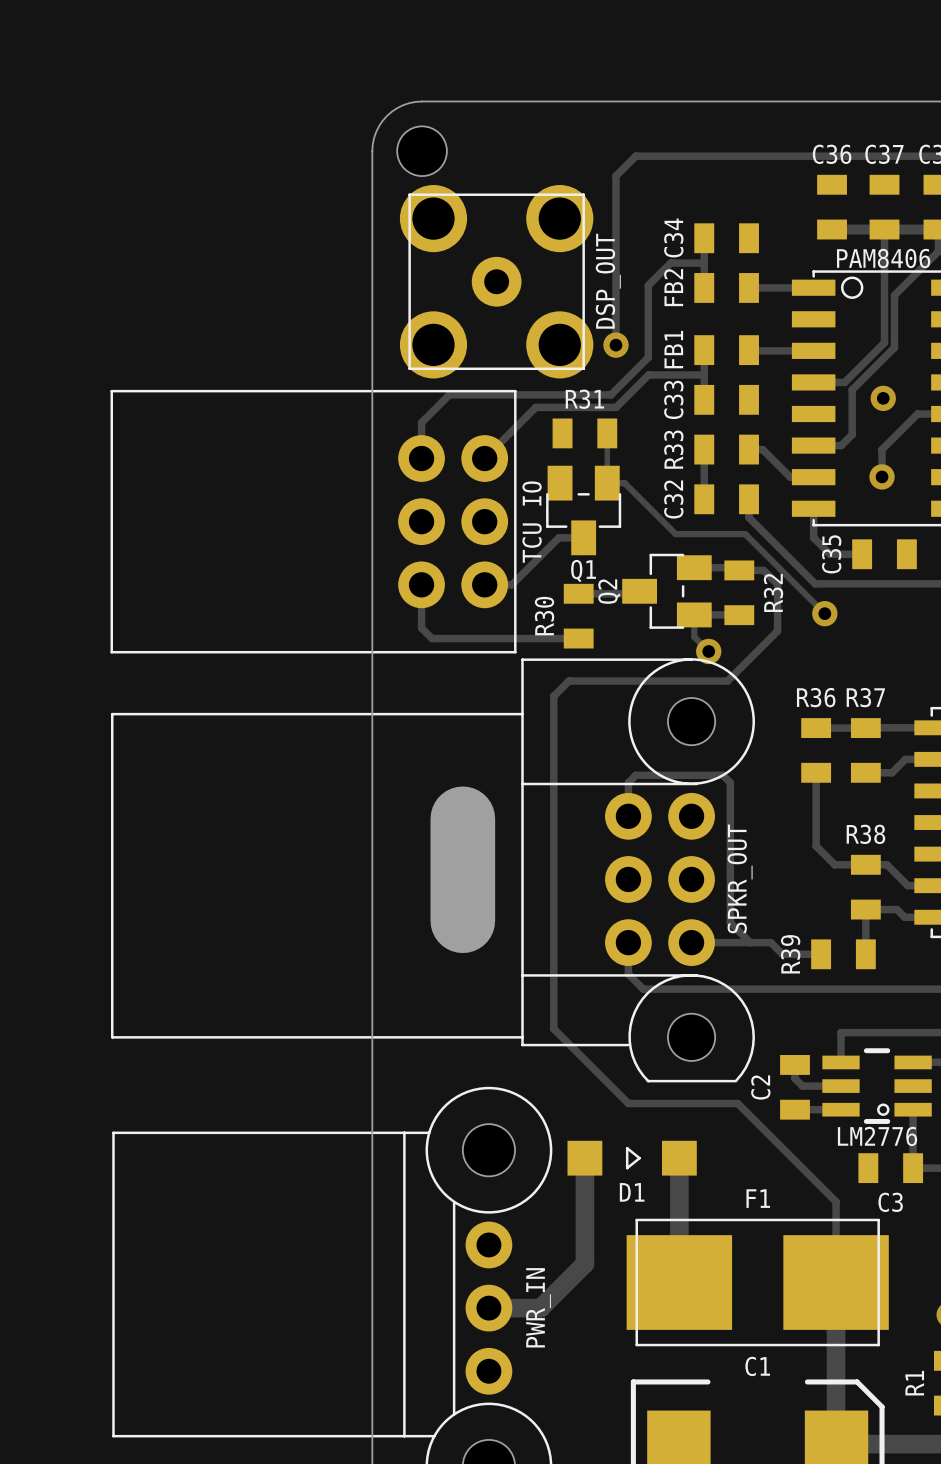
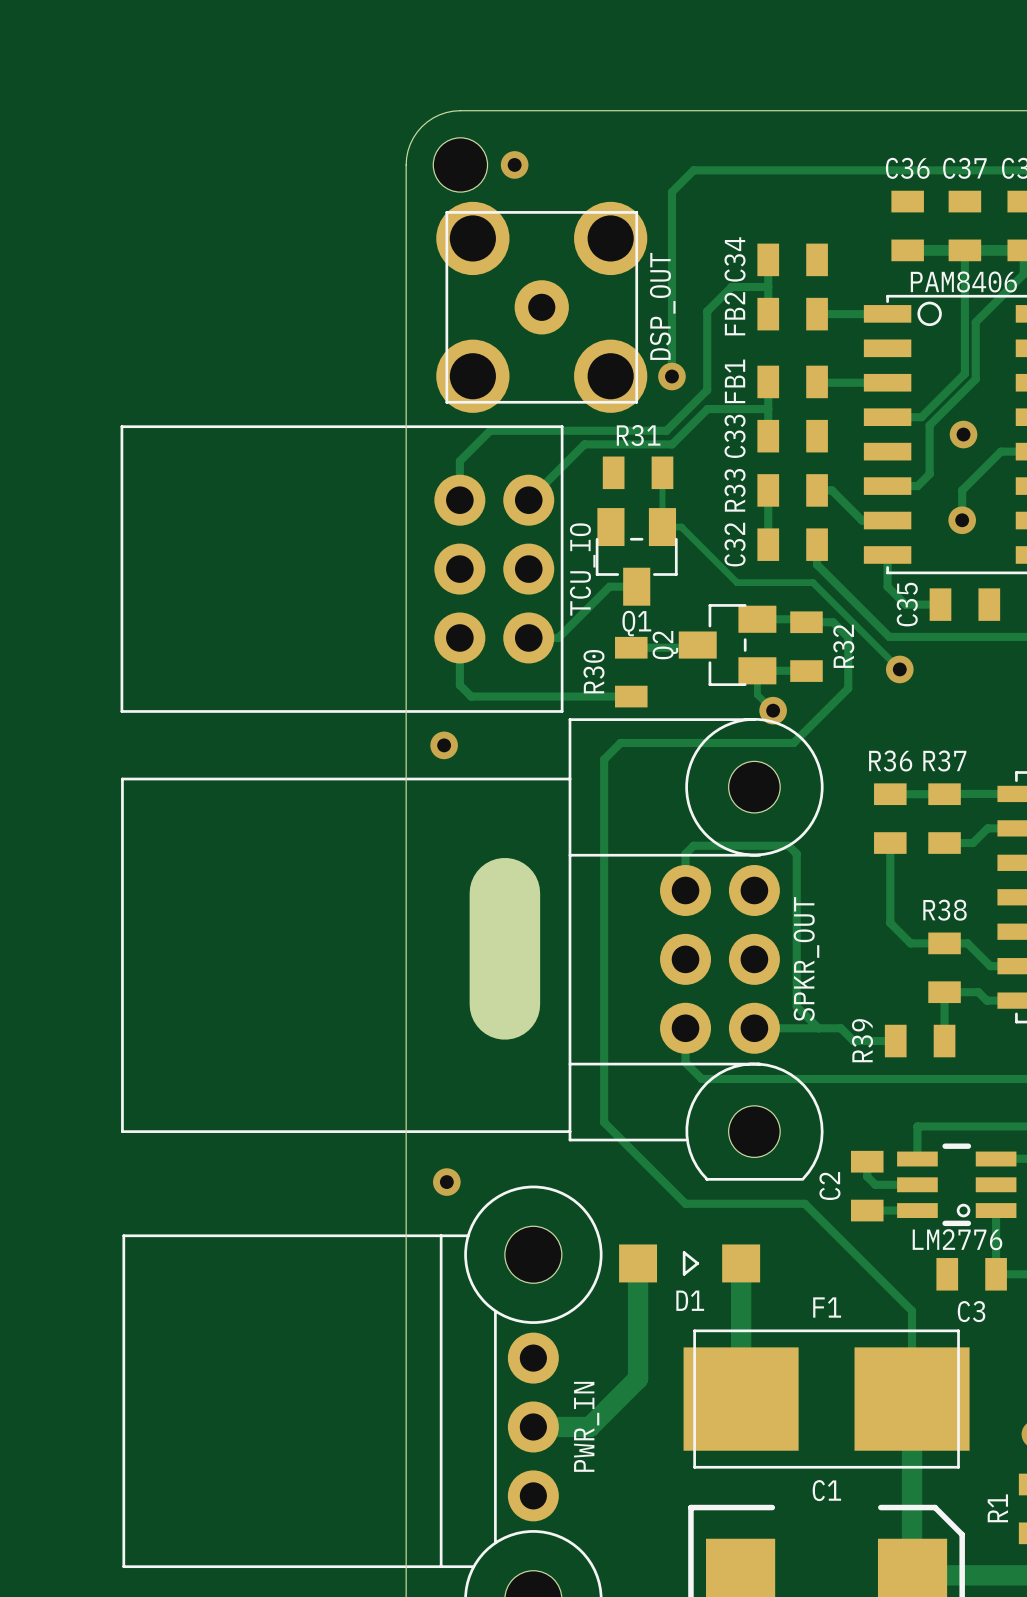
via: none -> (514, 164)
via: none -> (444, 745)
via: none -> (446, 1182)

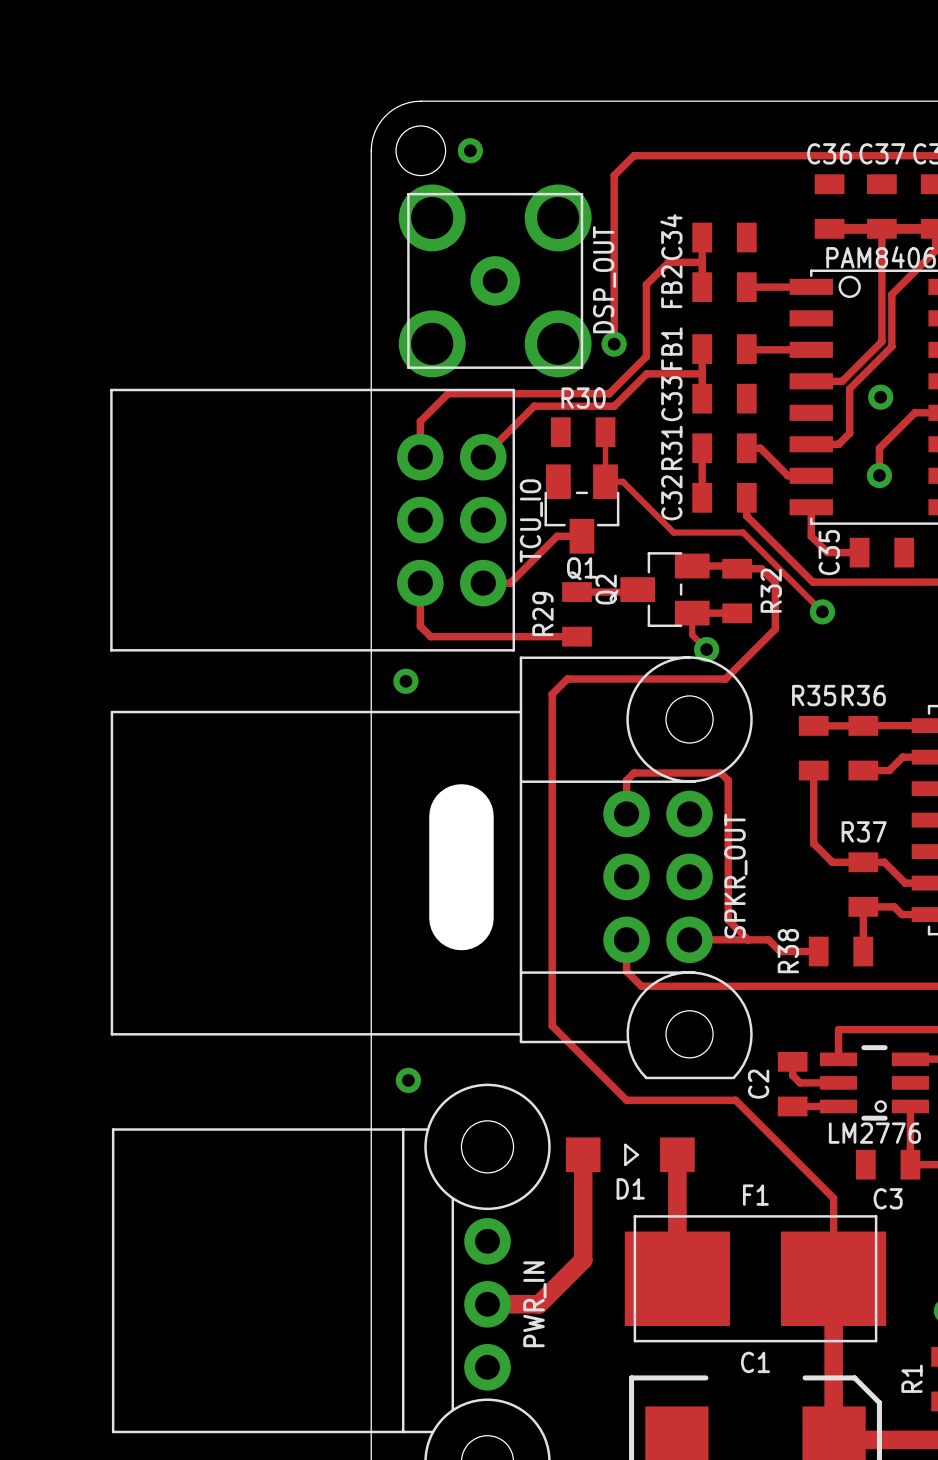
R31 name: R31 (638, 435) -> R30 (583, 398)
R33 name: R33 (735, 490) -> R31 (671, 447)
R30 name: R30 (593, 671) -> R29 (542, 613)
R36 name: R36 (890, 760) -> R35 (814, 695)
R37 name: R37 (944, 760) -> R36 (863, 695)
R38 name: R38 (945, 910) -> R37 (864, 831)
R39 name: R39 (862, 1040) -> R38 (788, 951)

